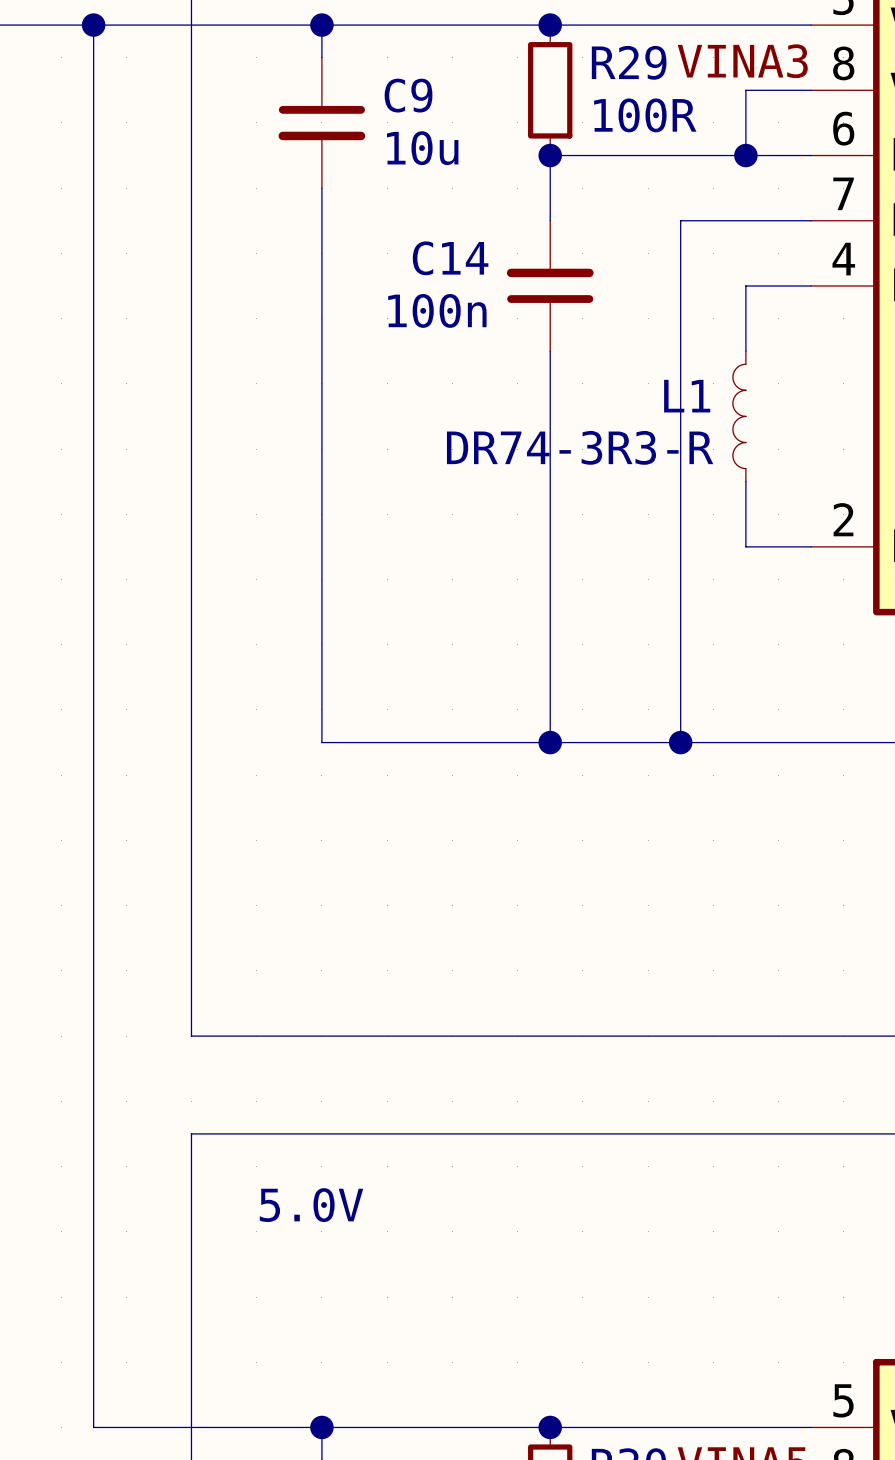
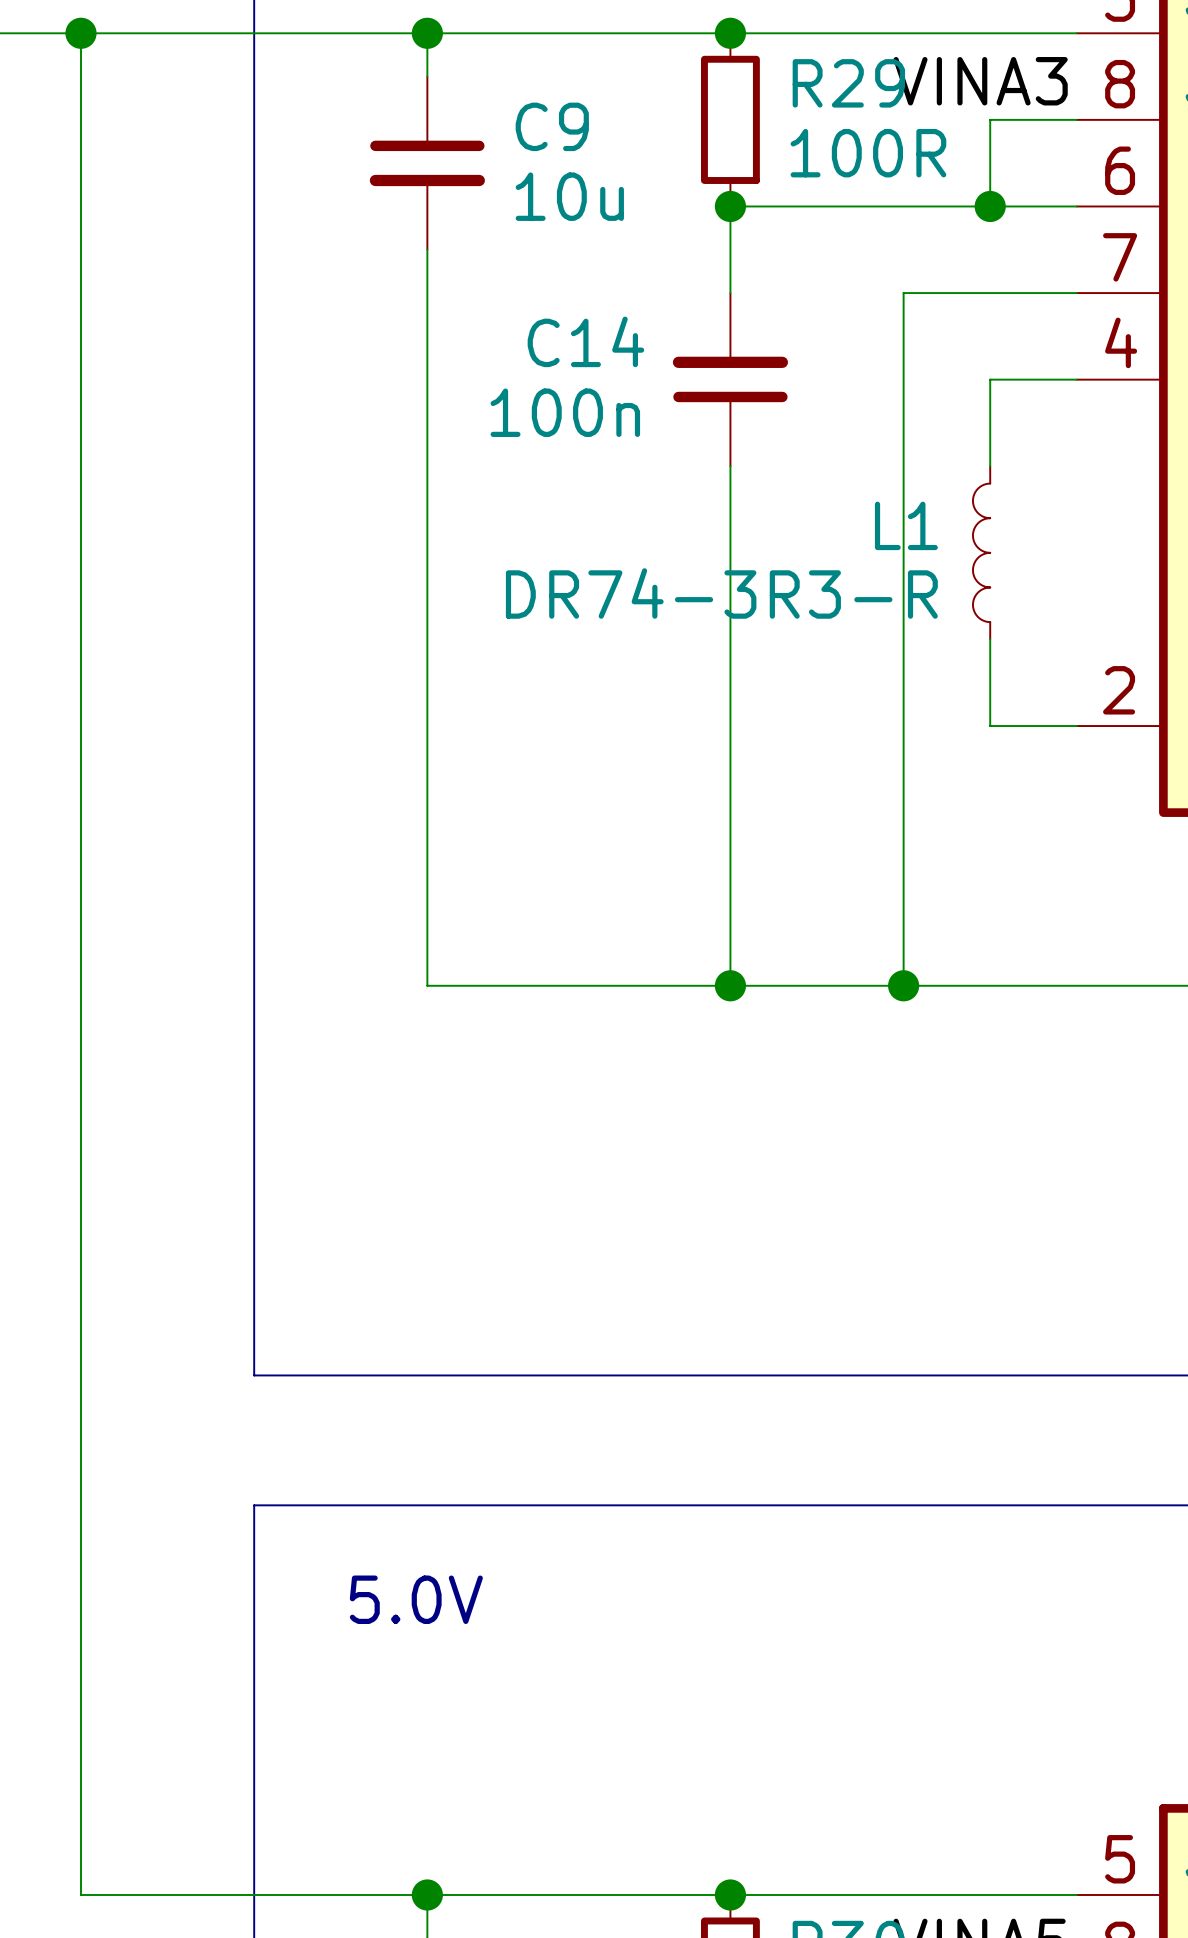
wire: (93, 25) (93, 1427) -> (81, 33) (81, 1894) (124, 1894)
junction position: (93, 25) -> (81, 33)

